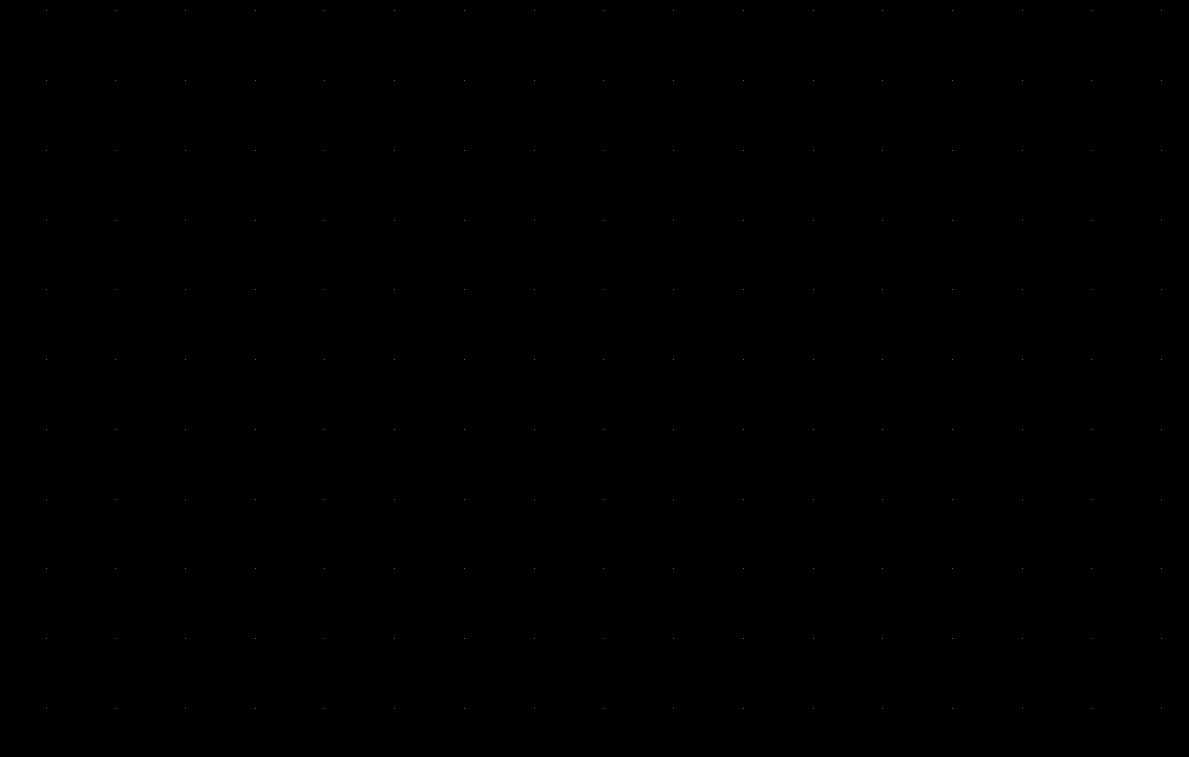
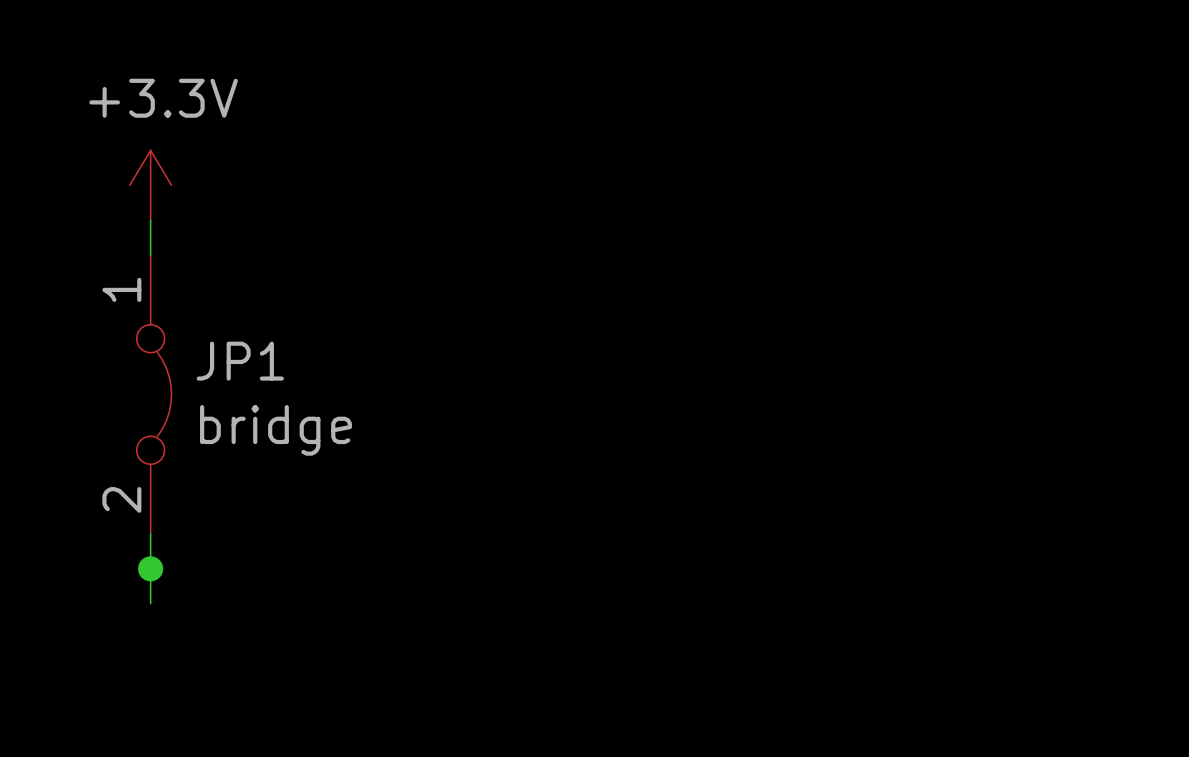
power symbol: none -> +3.3V (150, 185)
wire: none -> (150, 220) (150, 255)
JP1: none -> bridge (154, 394)
wire: none -> (150, 533) (150, 603)
junction: none -> (150, 568)

